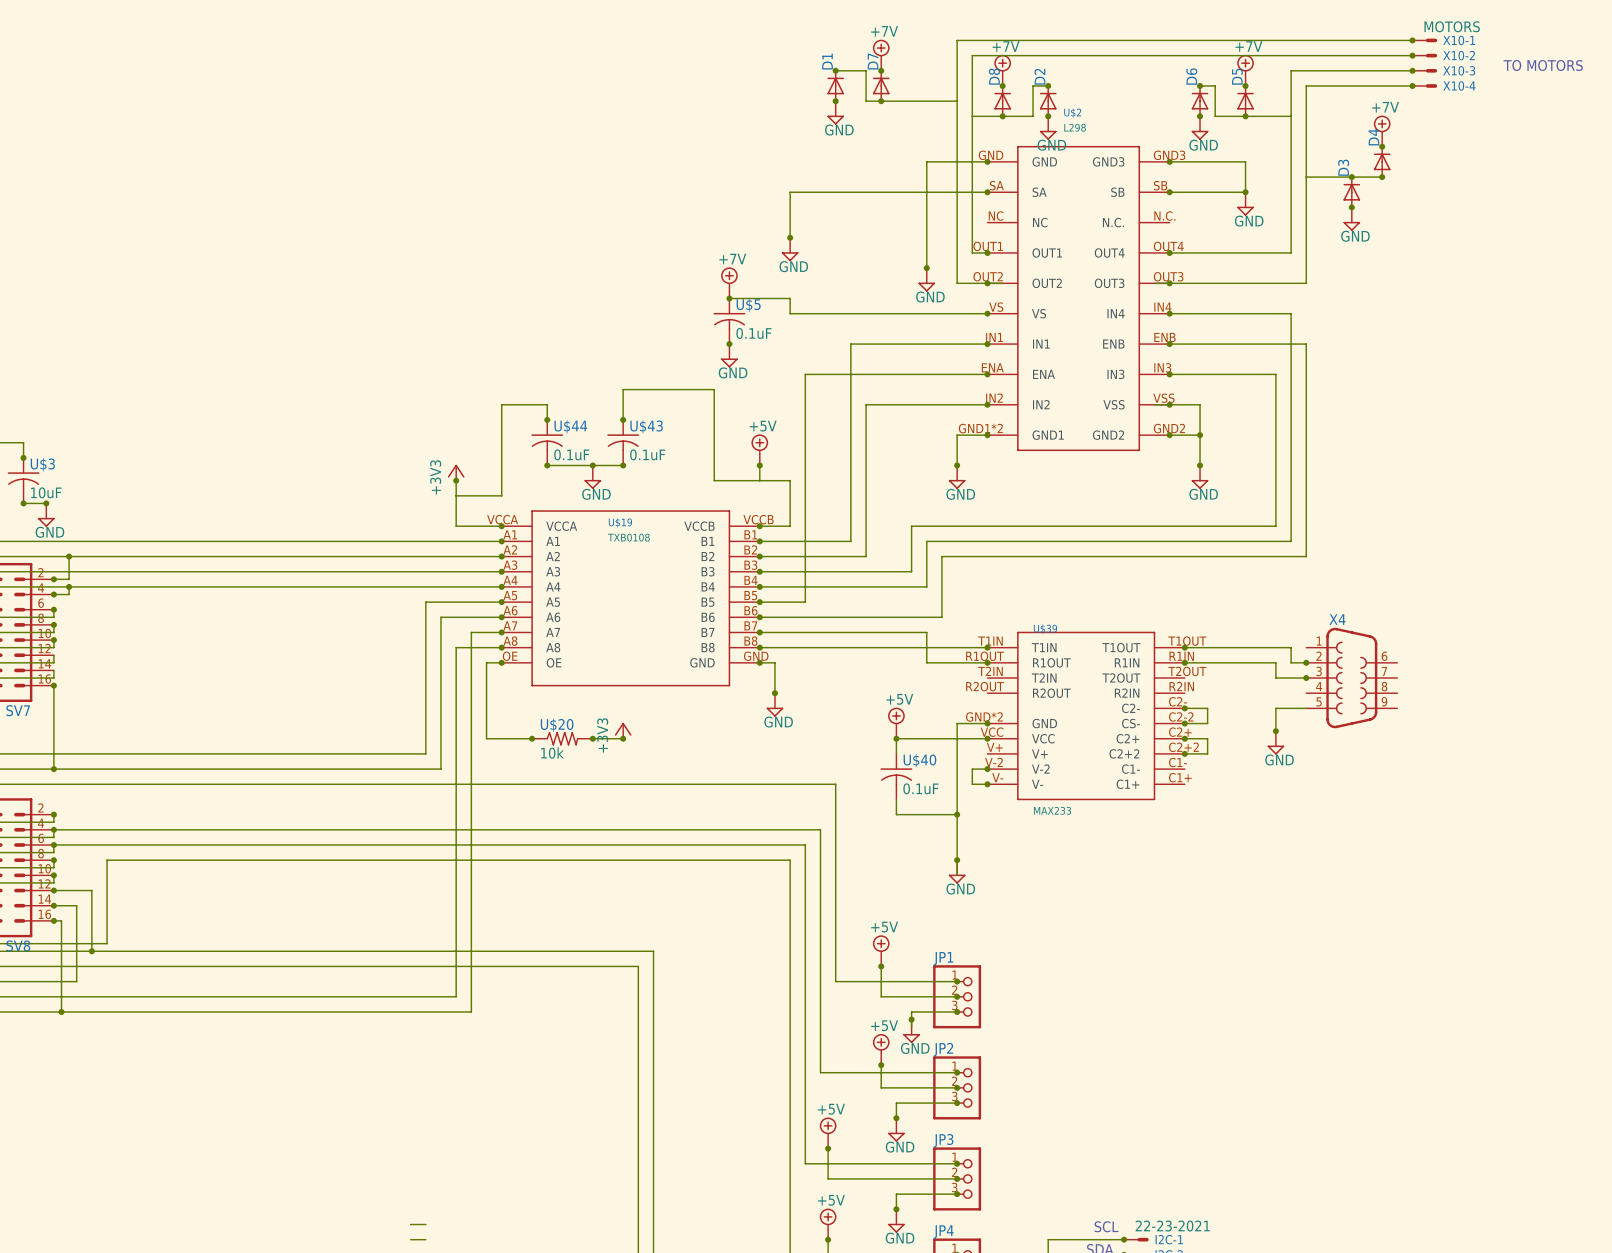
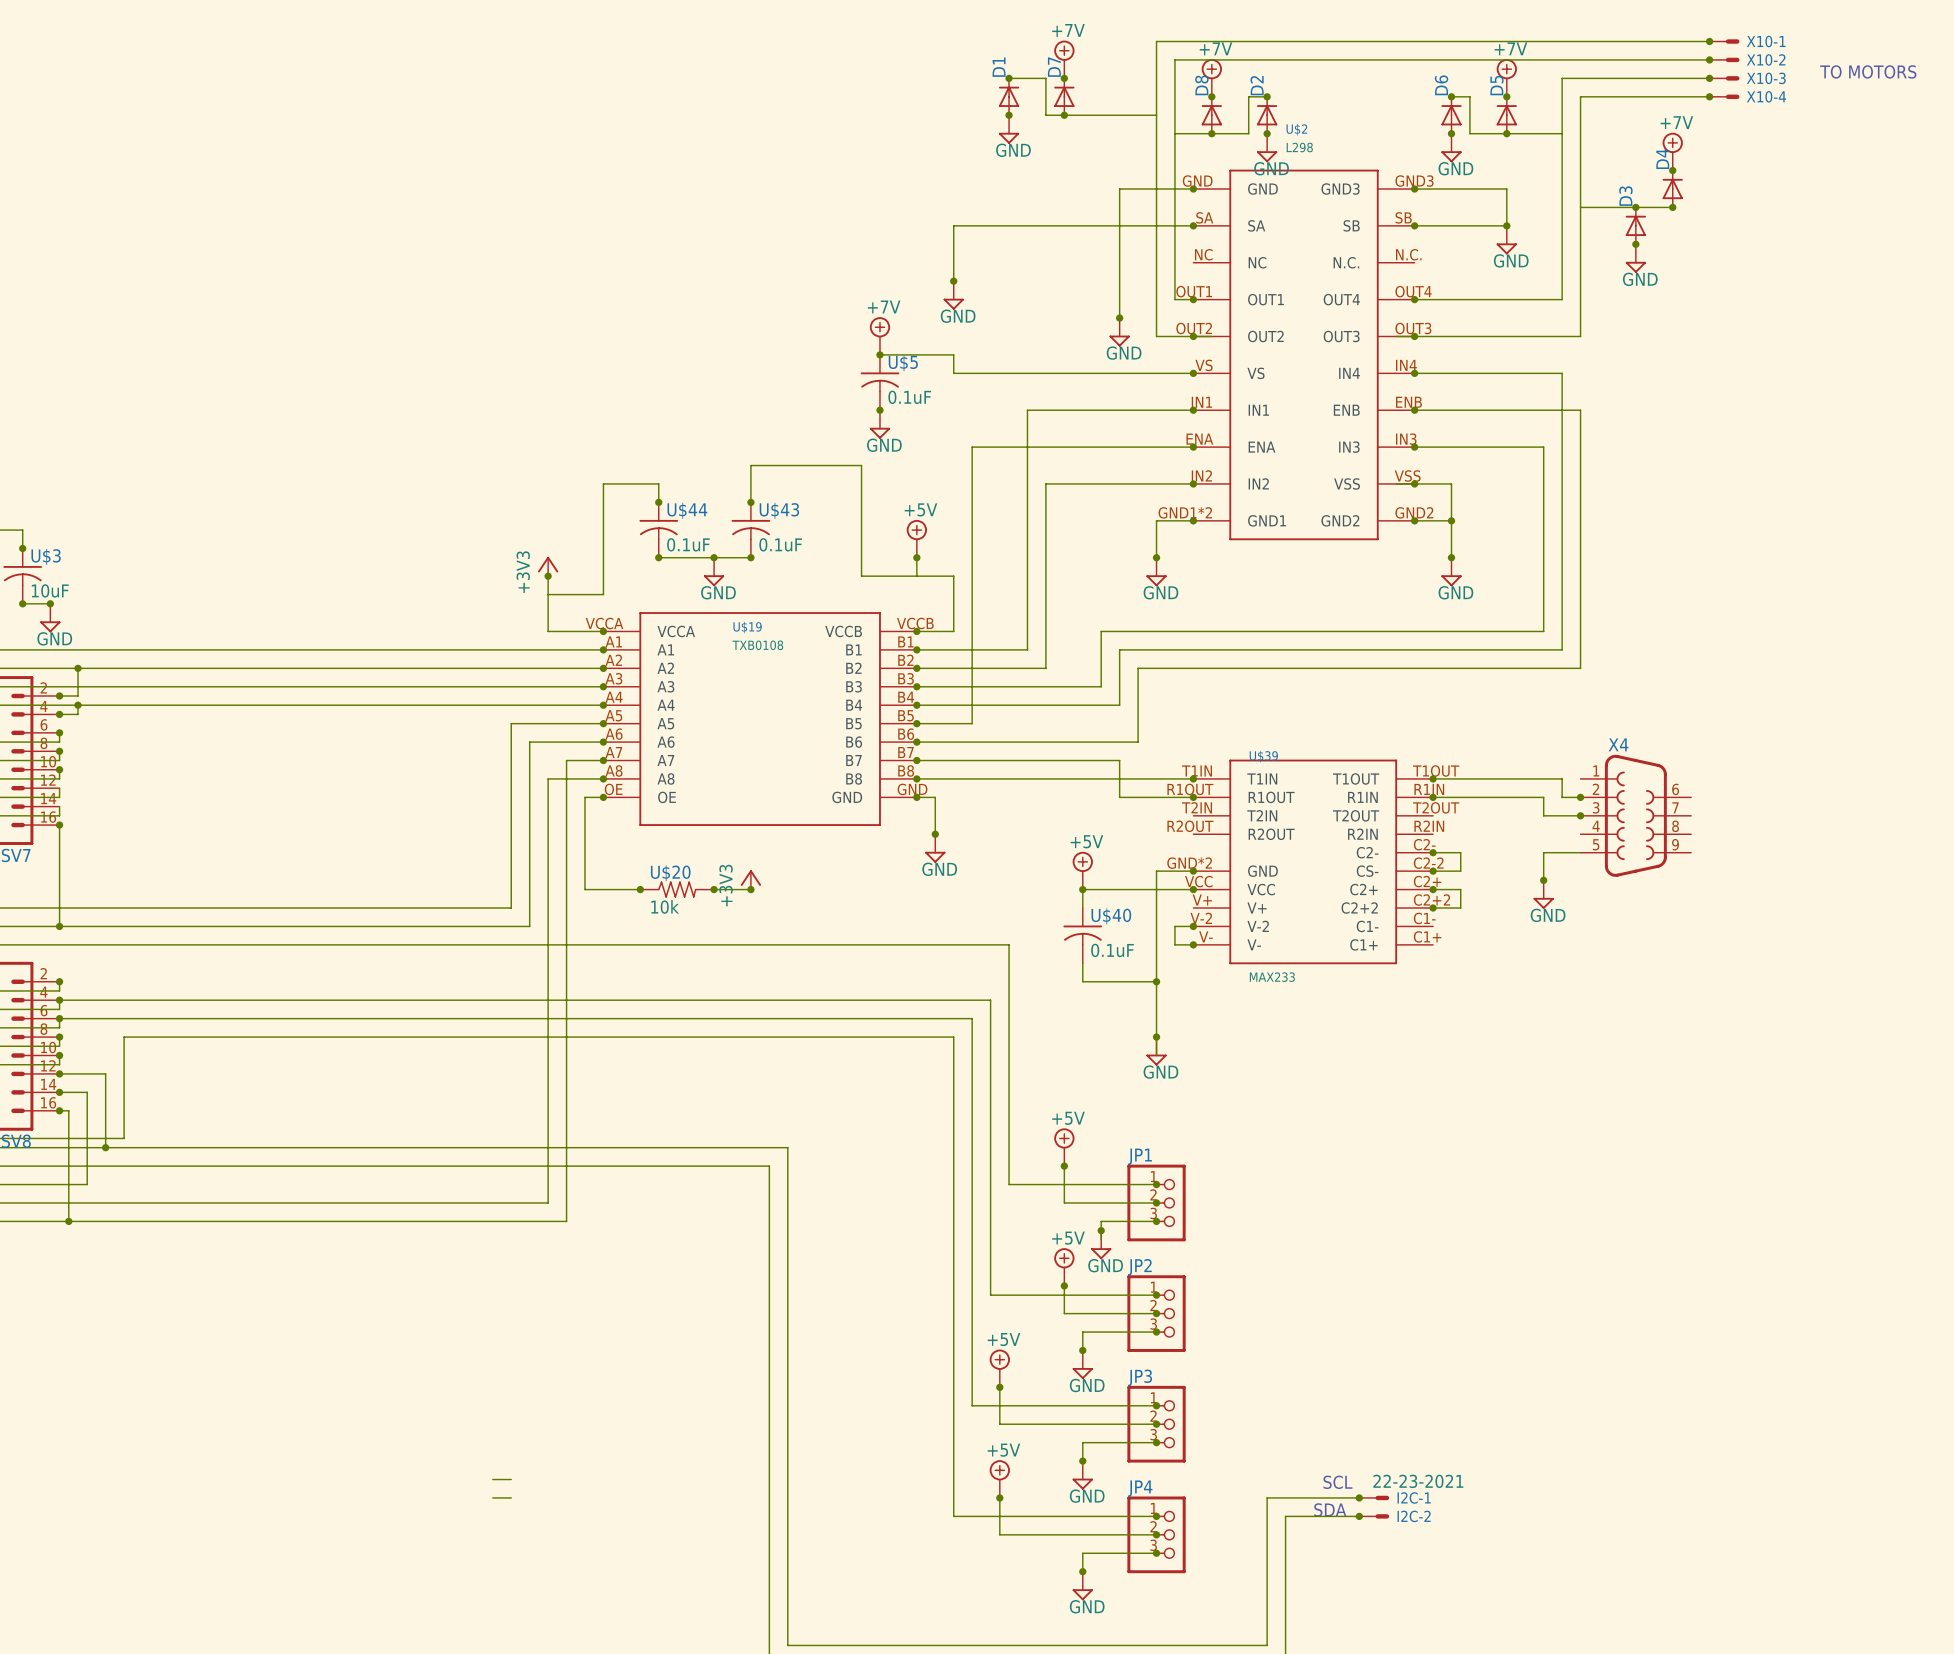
X10-1 value: MOTORS (1452, 26) -> none

